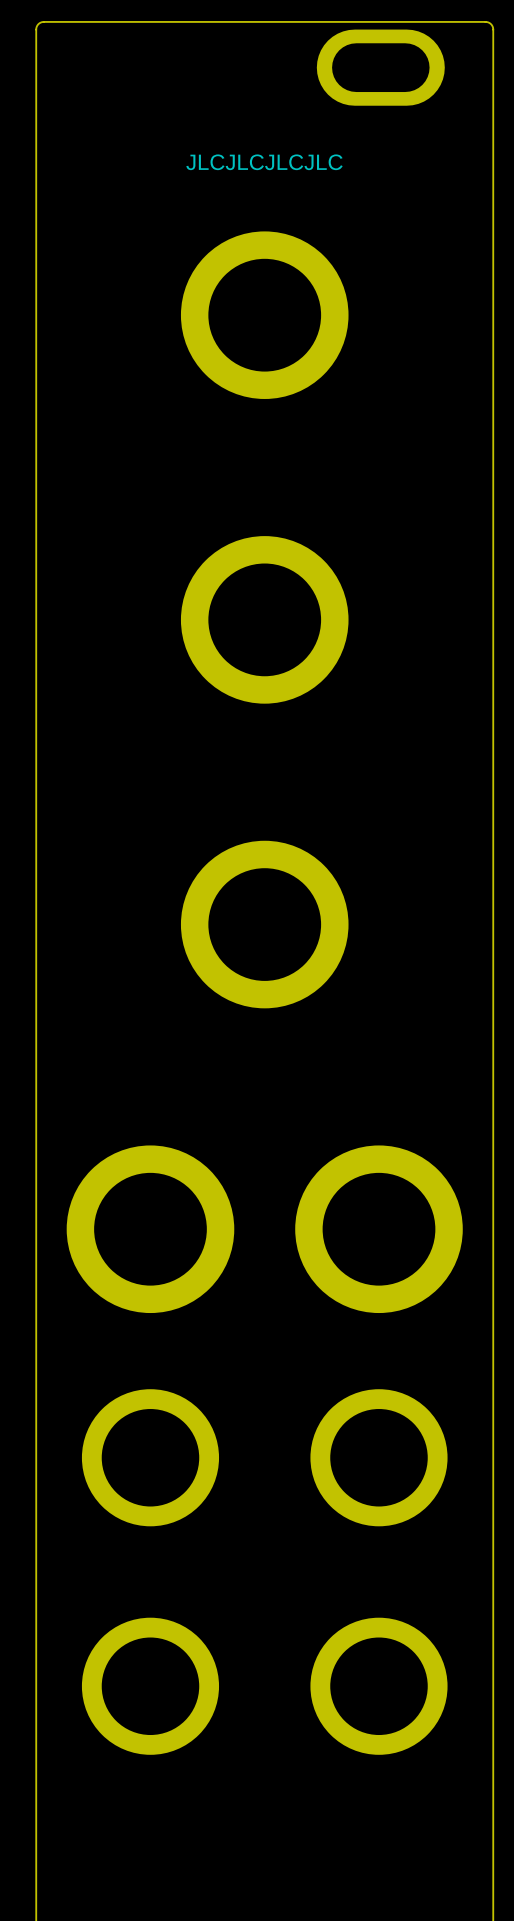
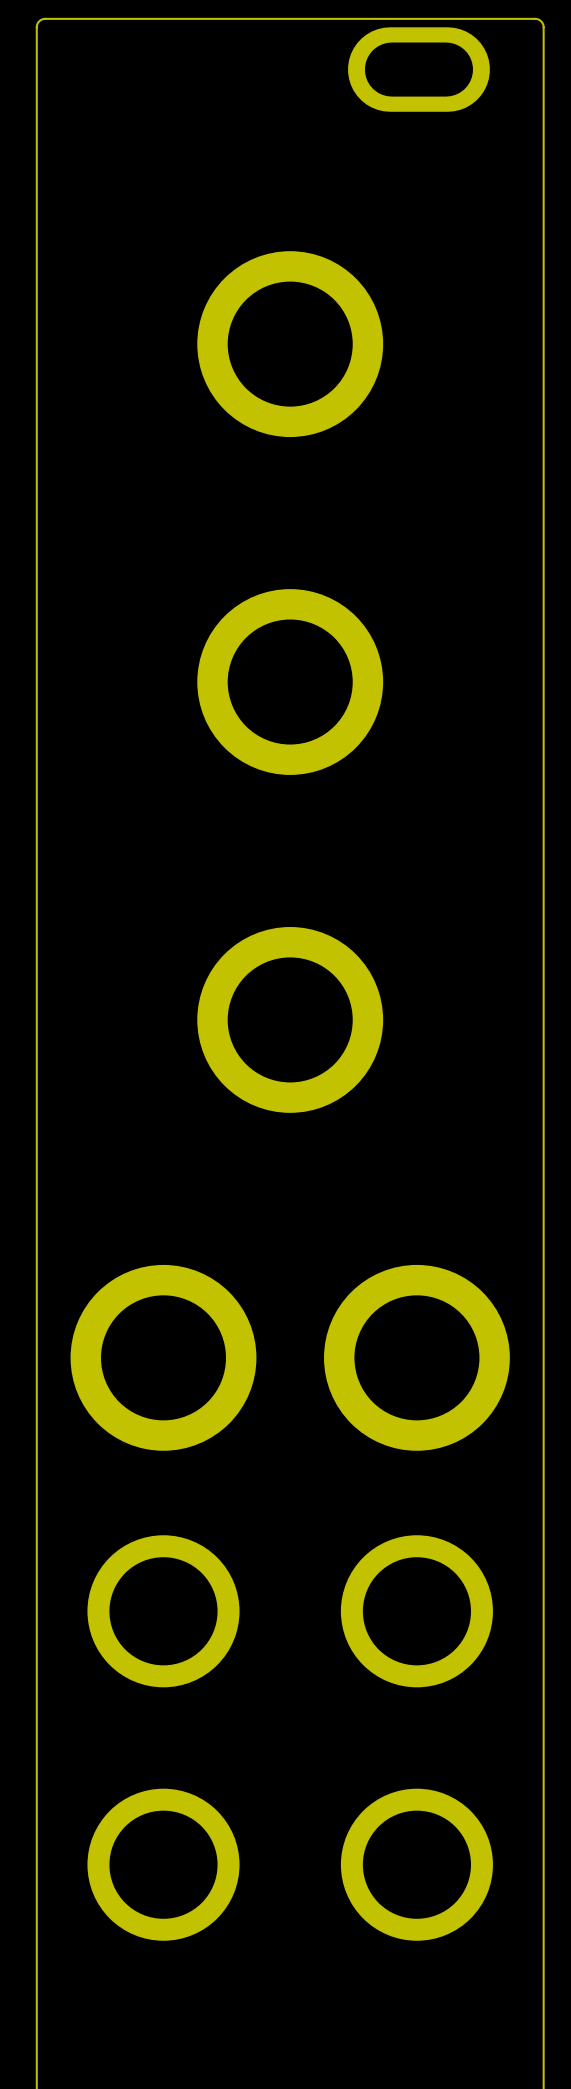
text: JLCJLCJLCJLC (264, 162) -> none

